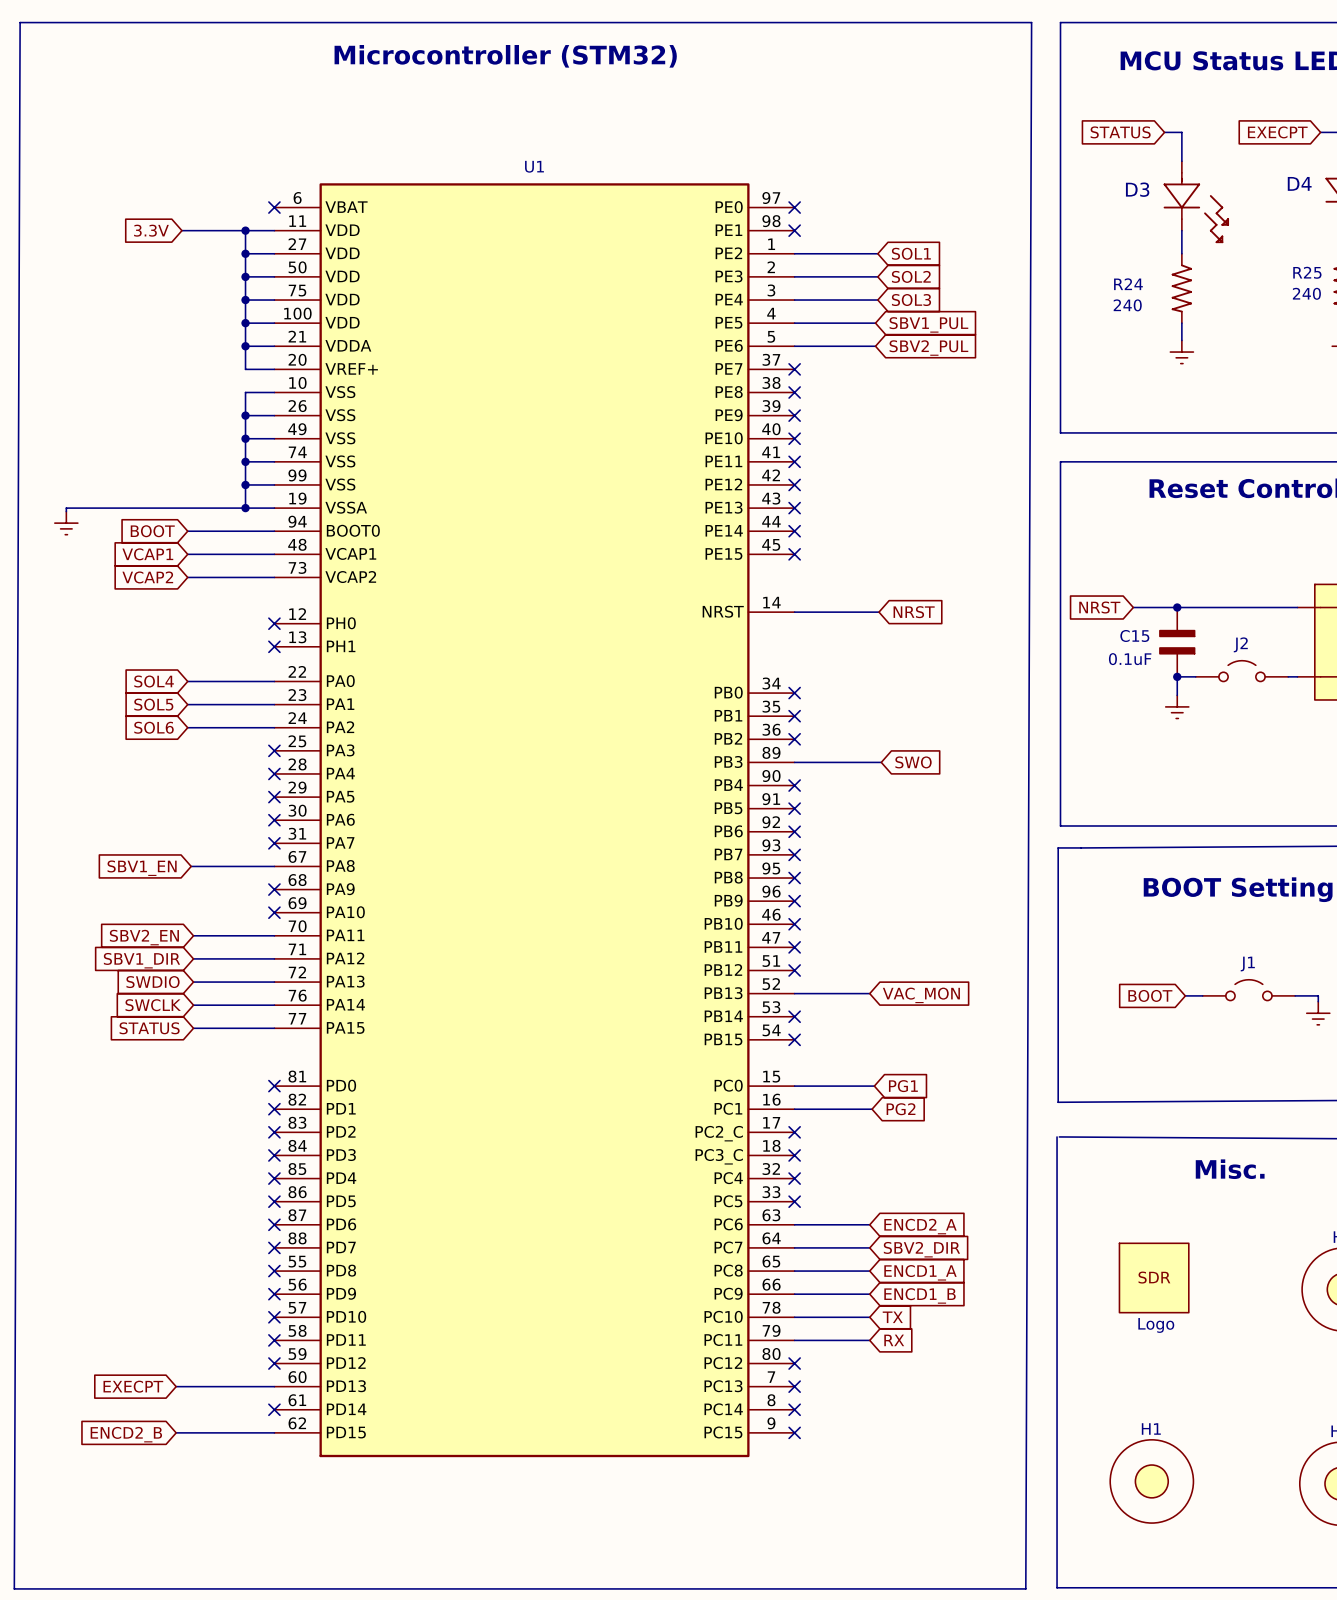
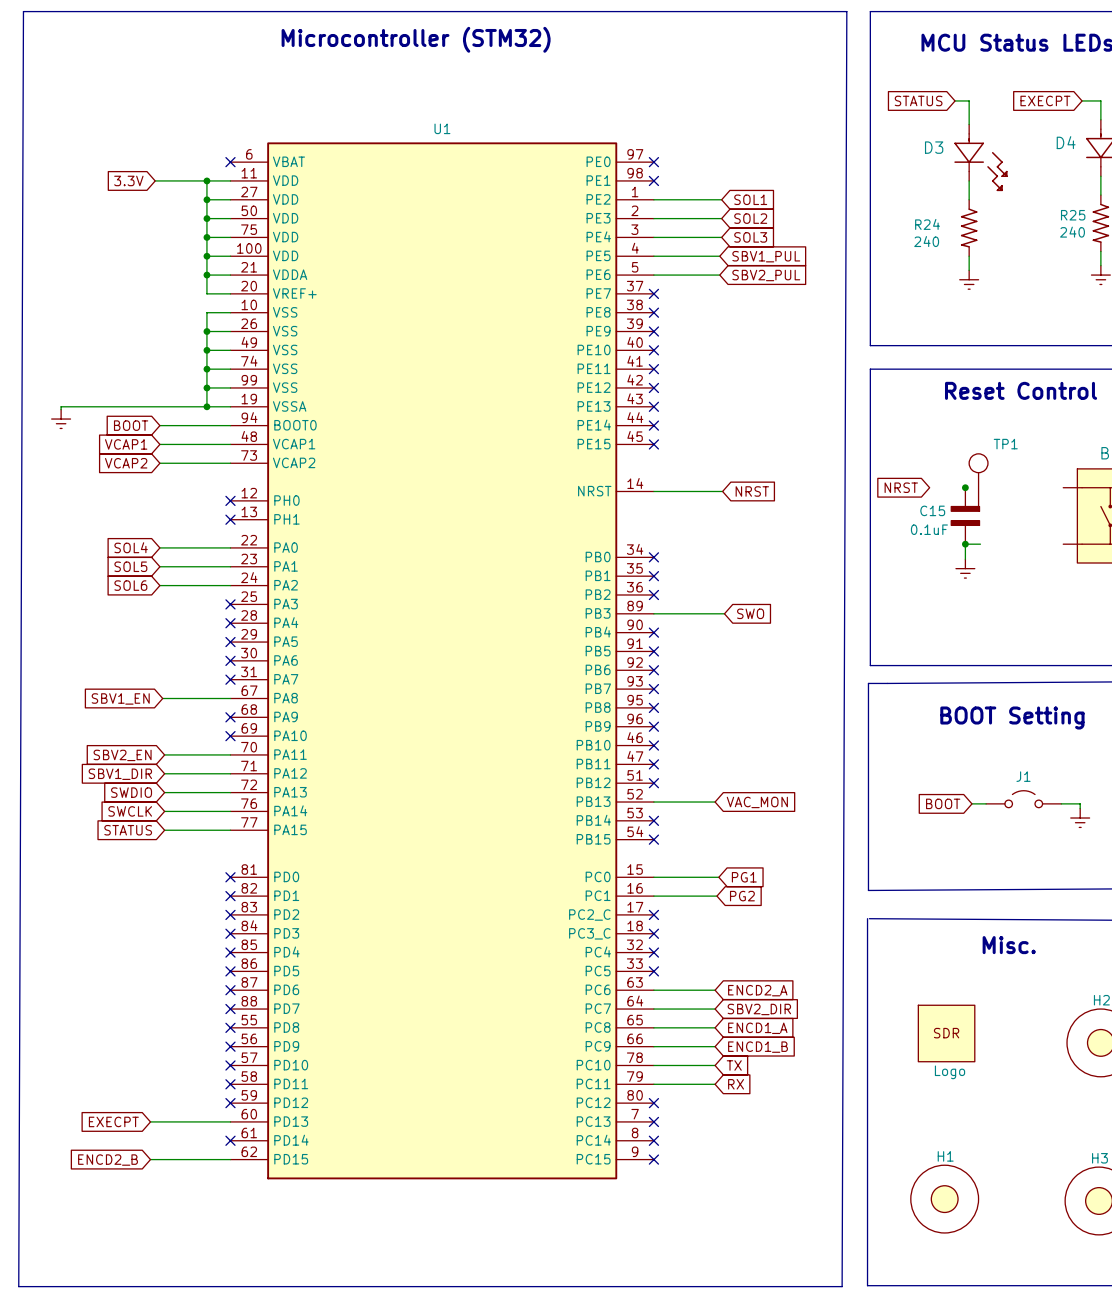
TP1: none -> (978, 482)
wire: (1133, 607) (1297, 607) -> none
J2: (1241, 671) -> none
wire: (1288, 676) (1297, 676) -> none

